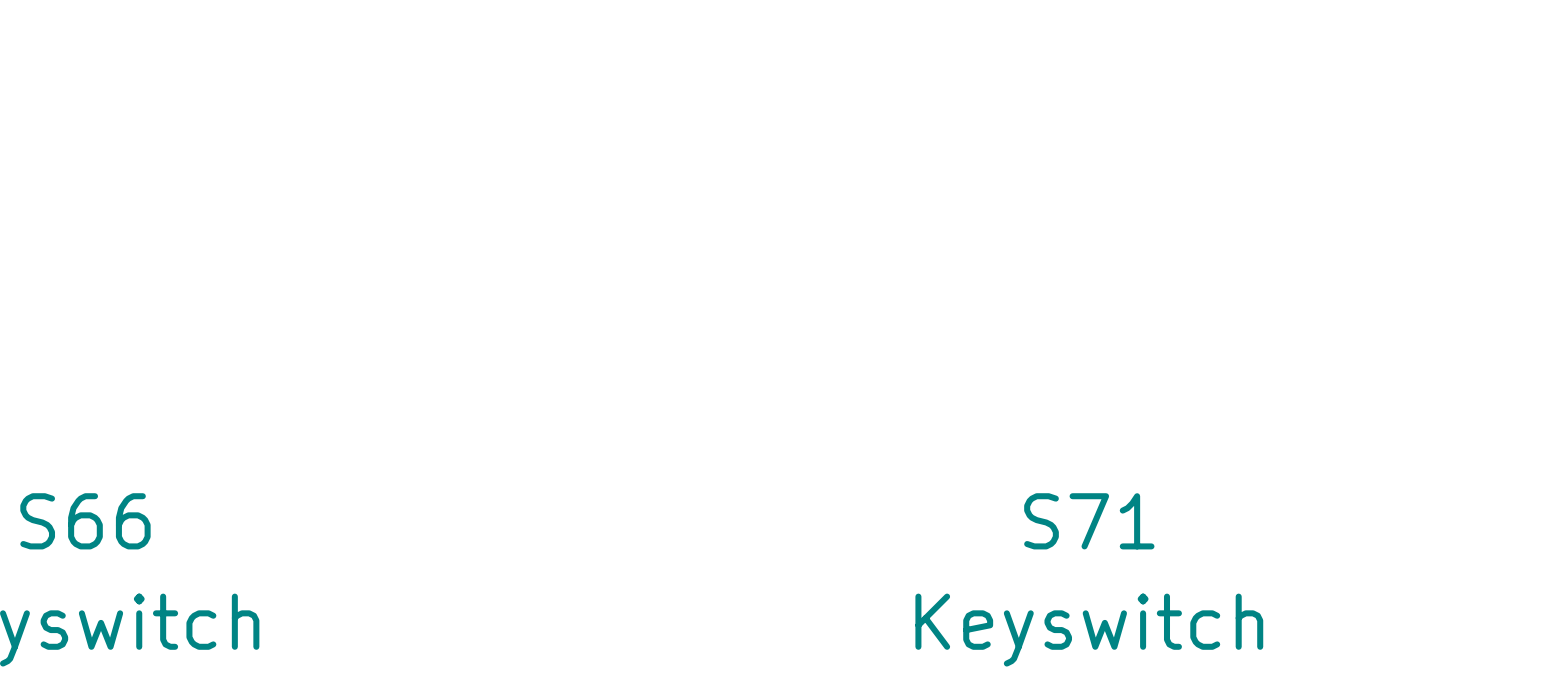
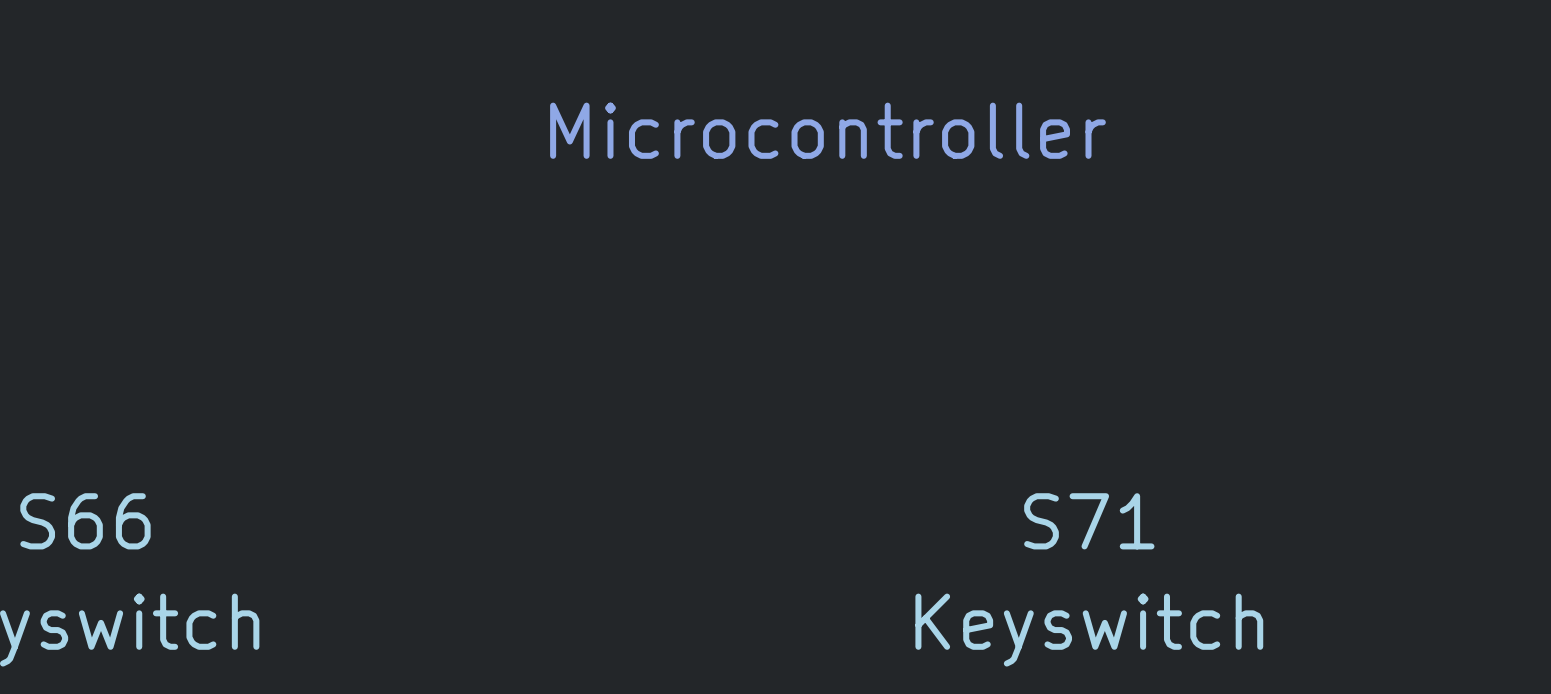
text: none -> Microcontroller (827, 130)

